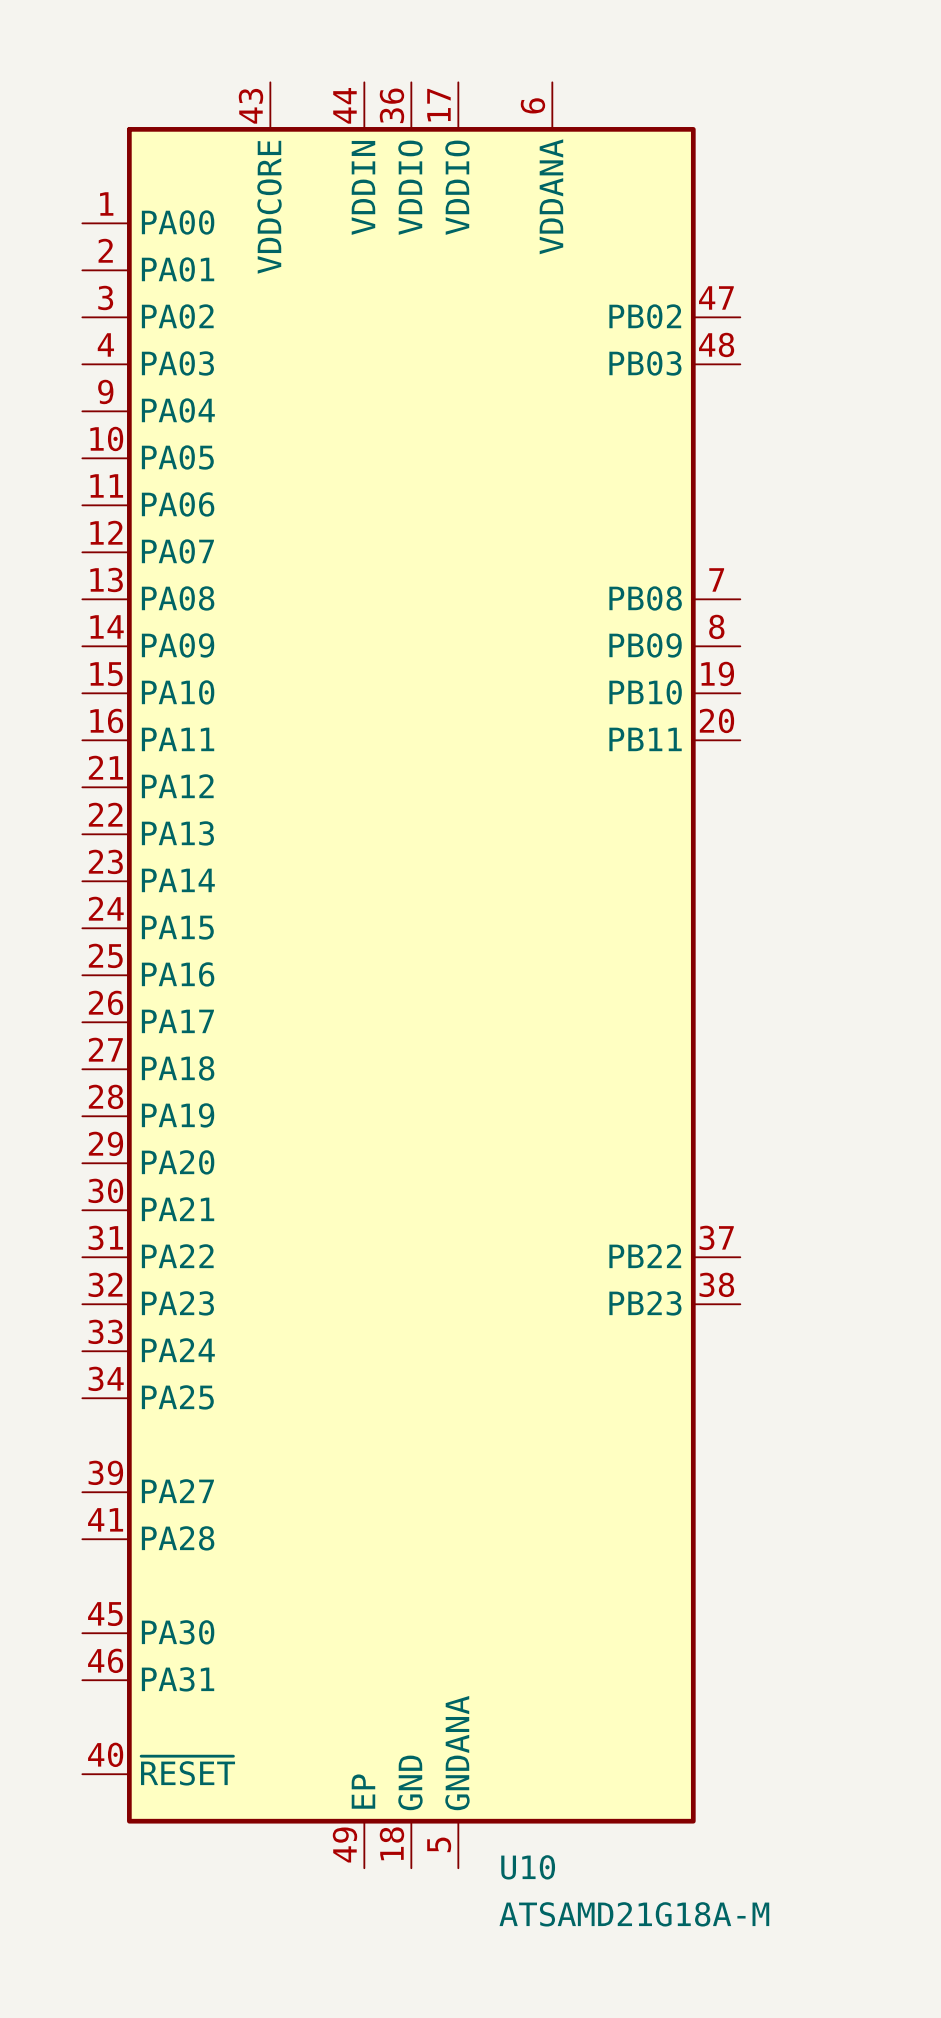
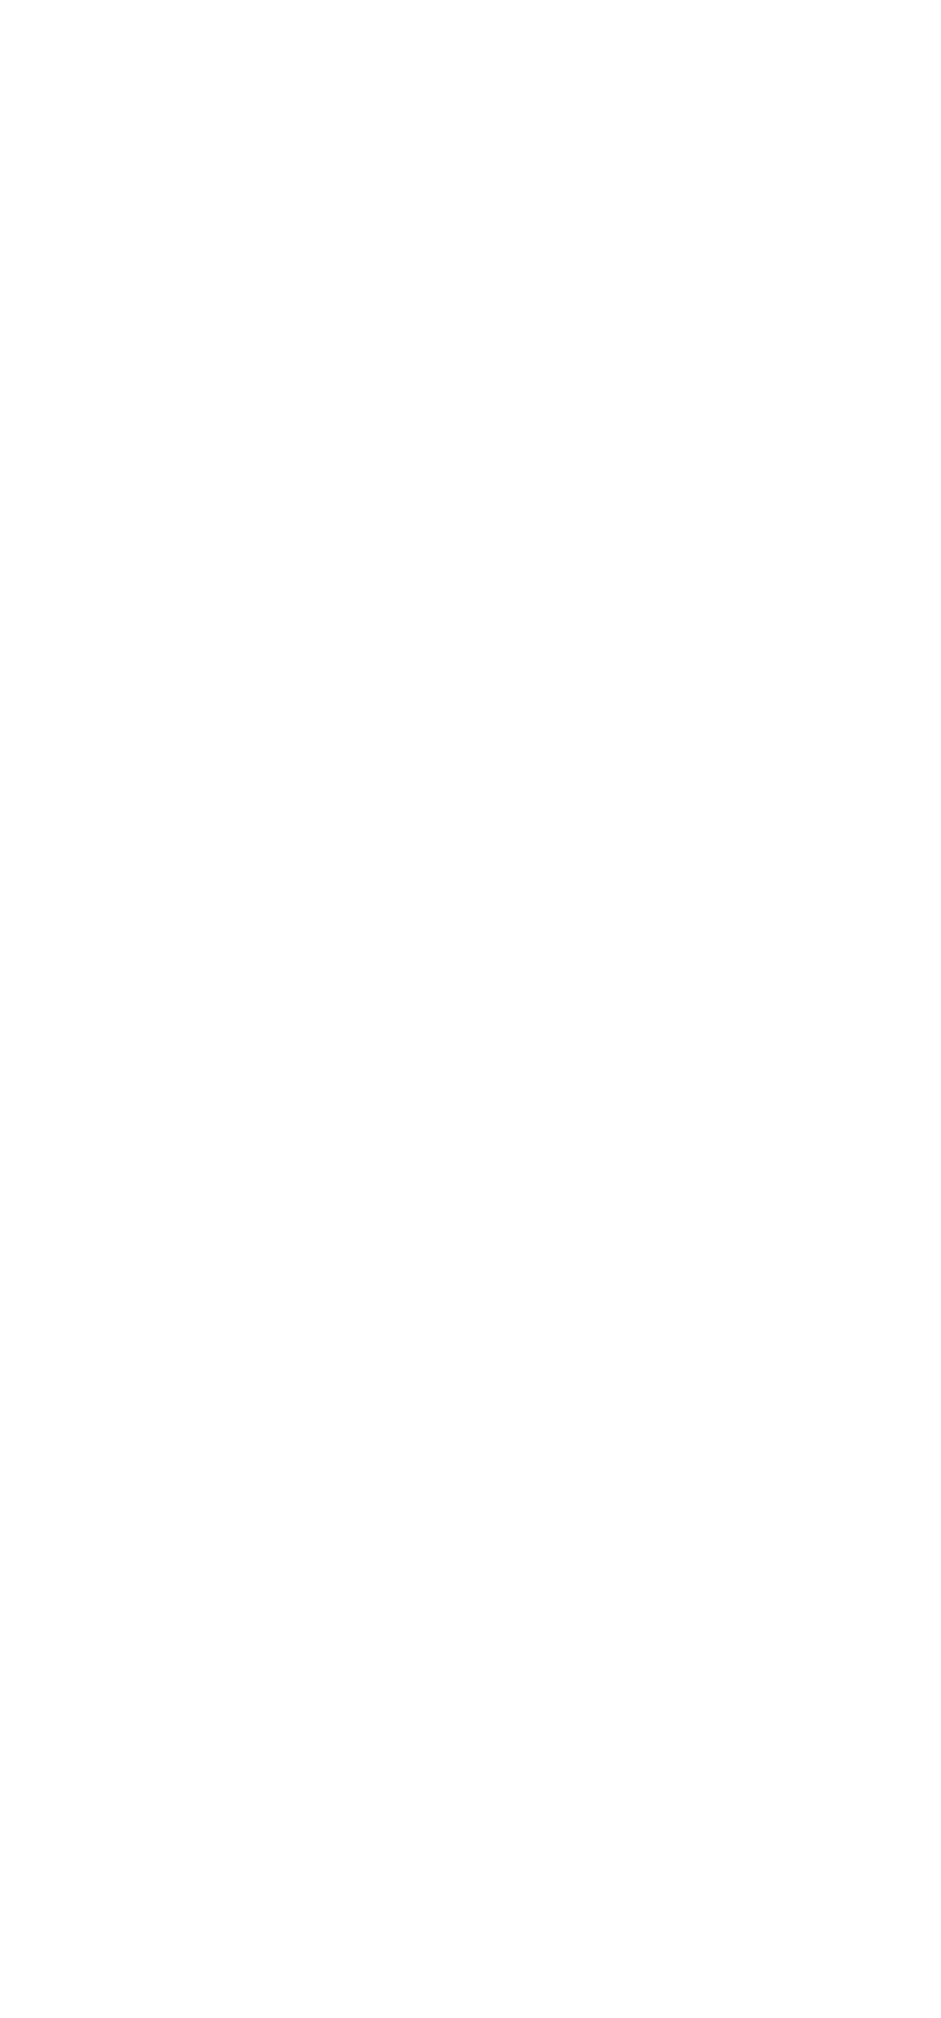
U10: ATSAMD21G18A-M (411, 975) -> none

